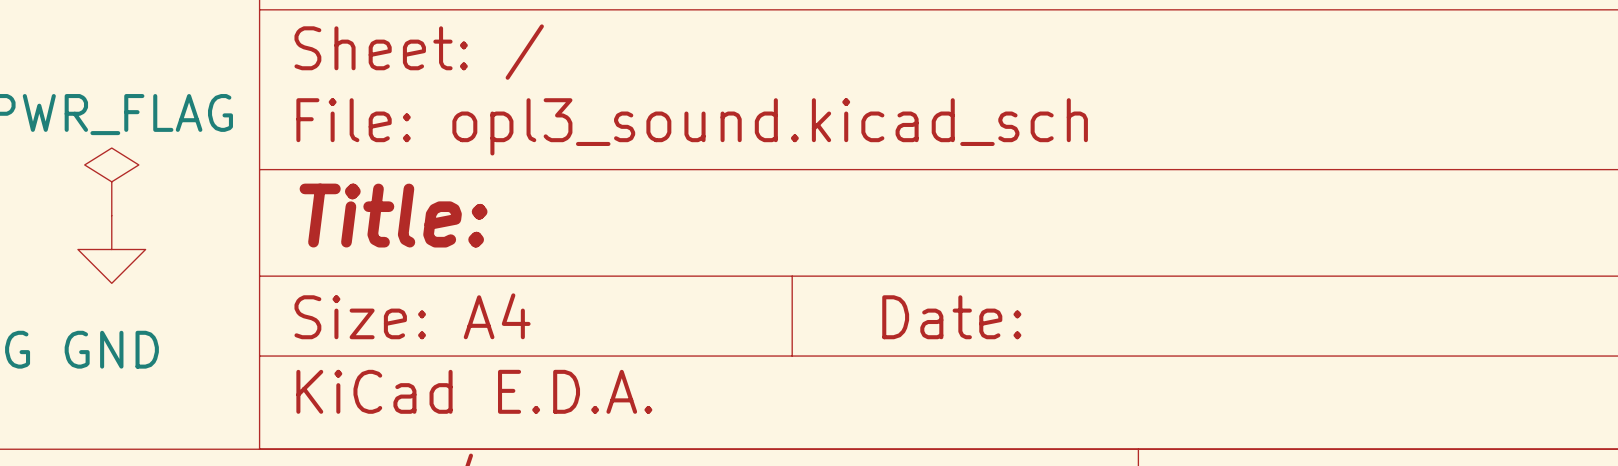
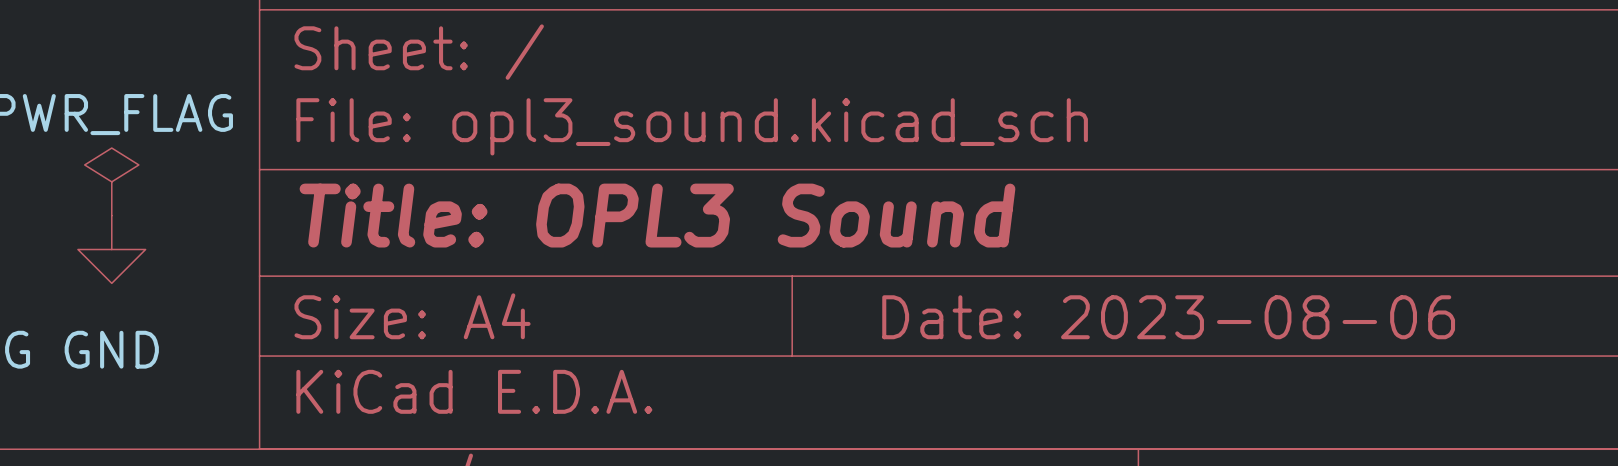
title block: Title: (393, 215) -> Title: OPL3 Sound (657, 215)
title block: Date: (951, 317) -> Date: 2023-08-06 (1168, 317)

